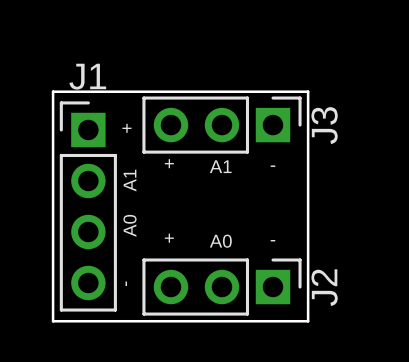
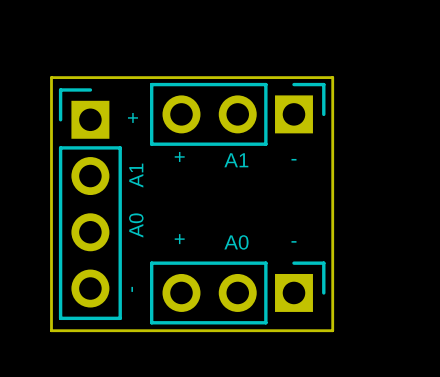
J1 name: J1 (87, 76) -> none
J3 name: J3 (324, 125) -> none
J2 name: J2 (324, 287) -> none

